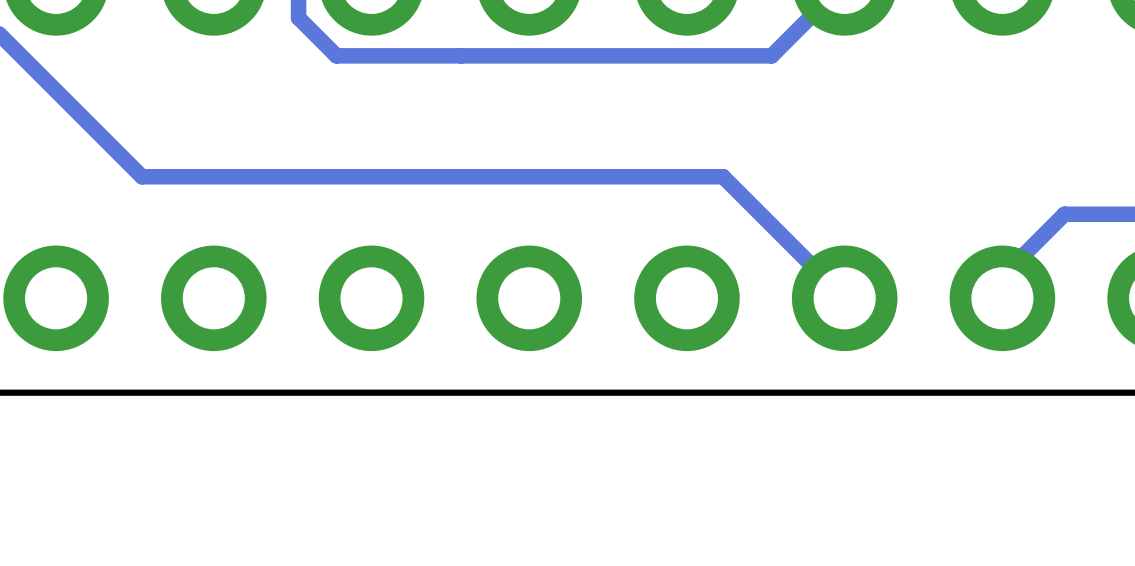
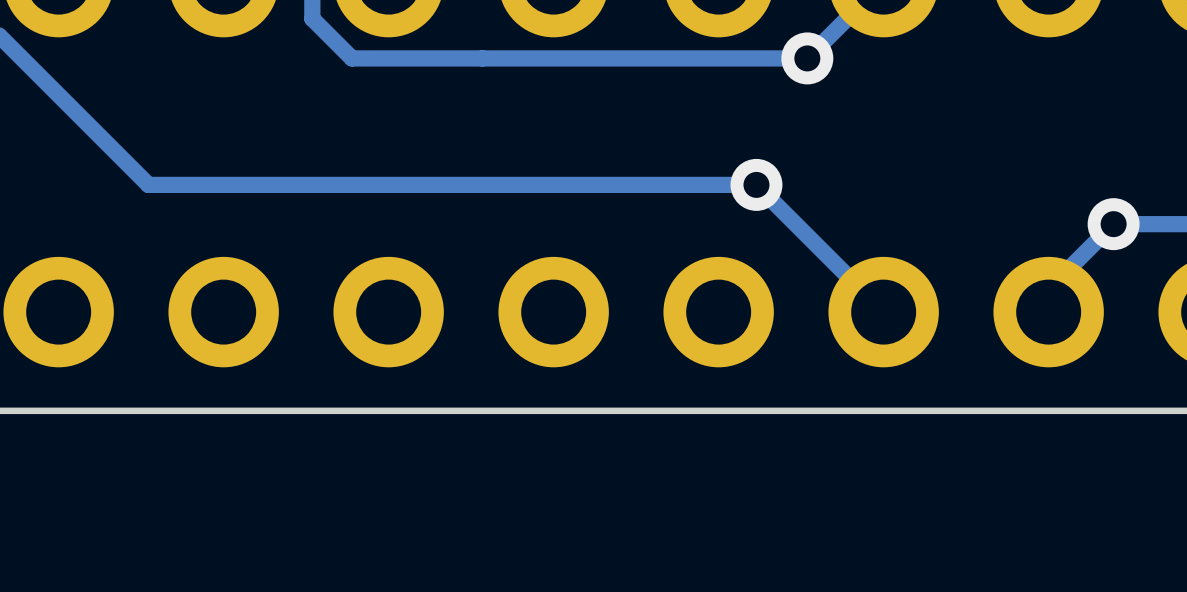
via: none -> (807, 58)
via: none -> (756, 184)
via: none -> (1113, 224)

